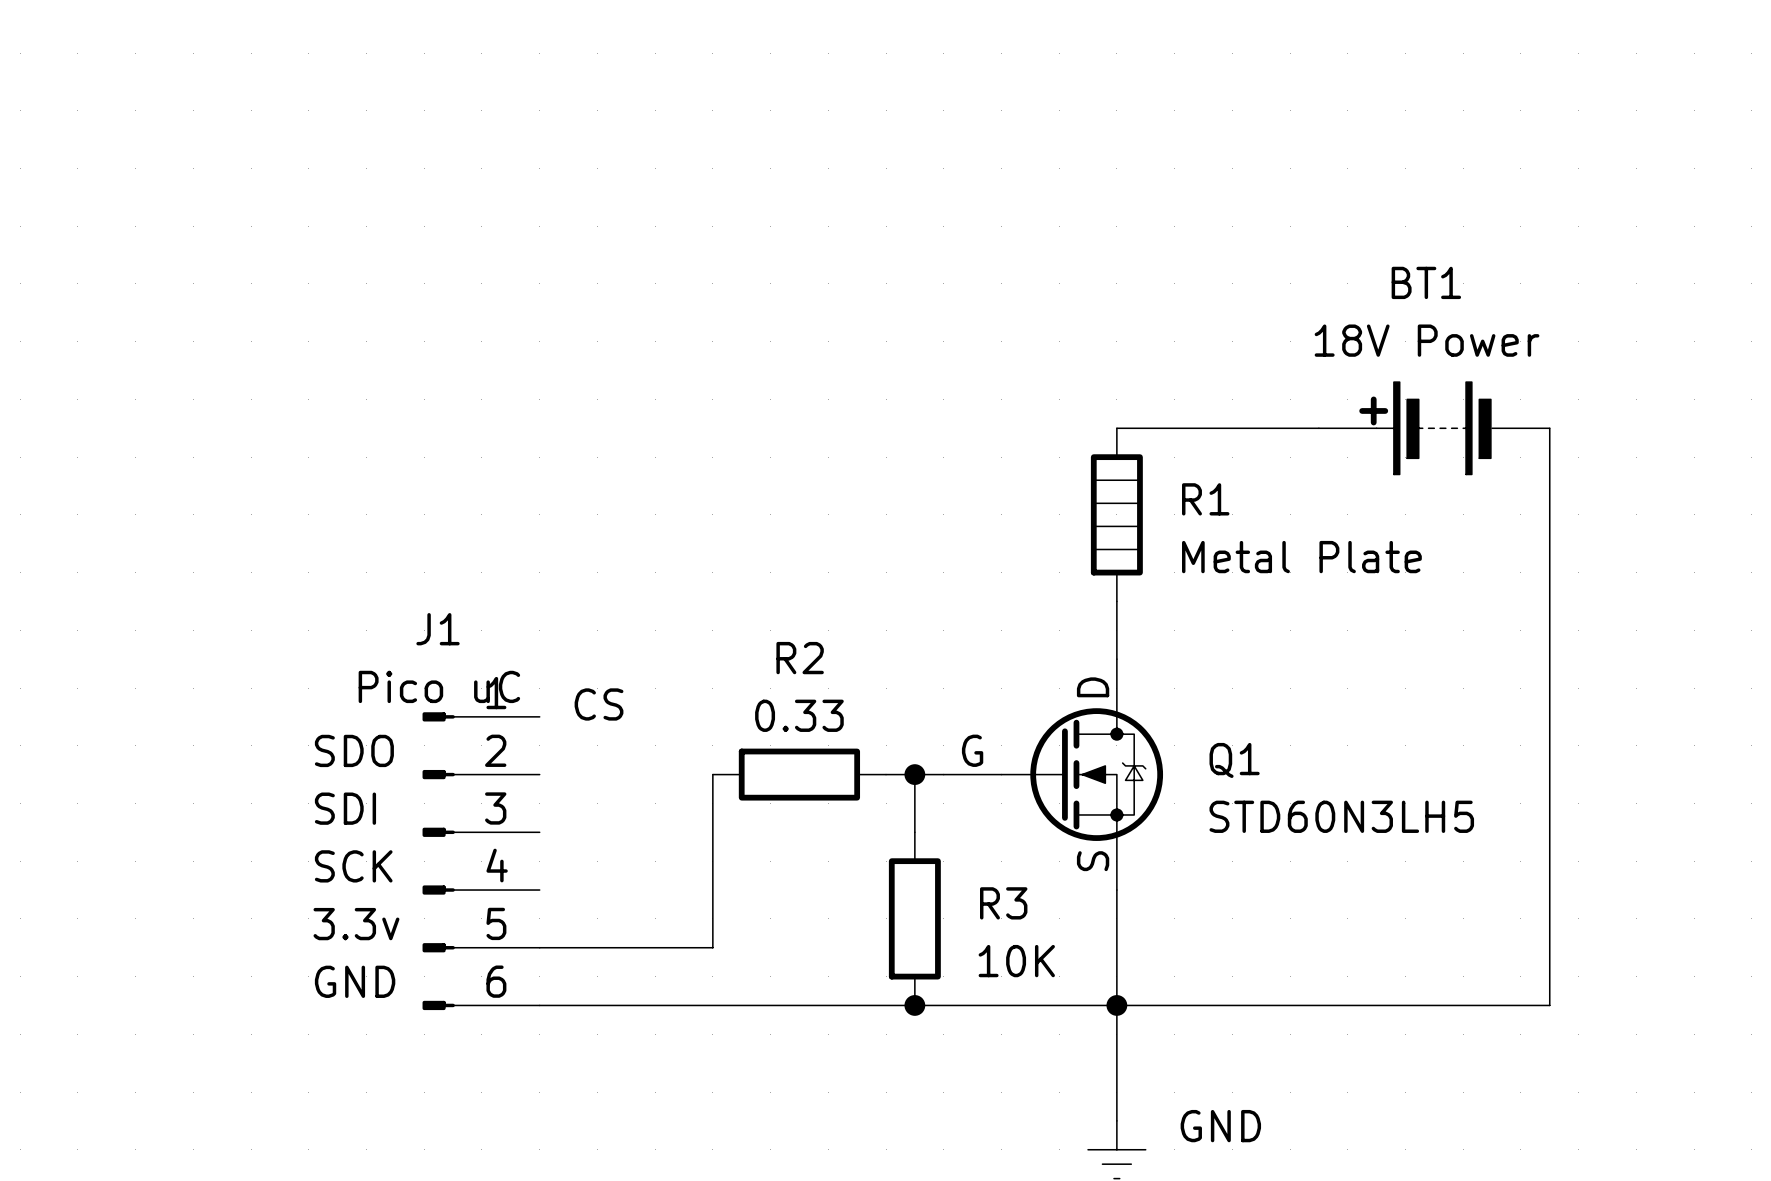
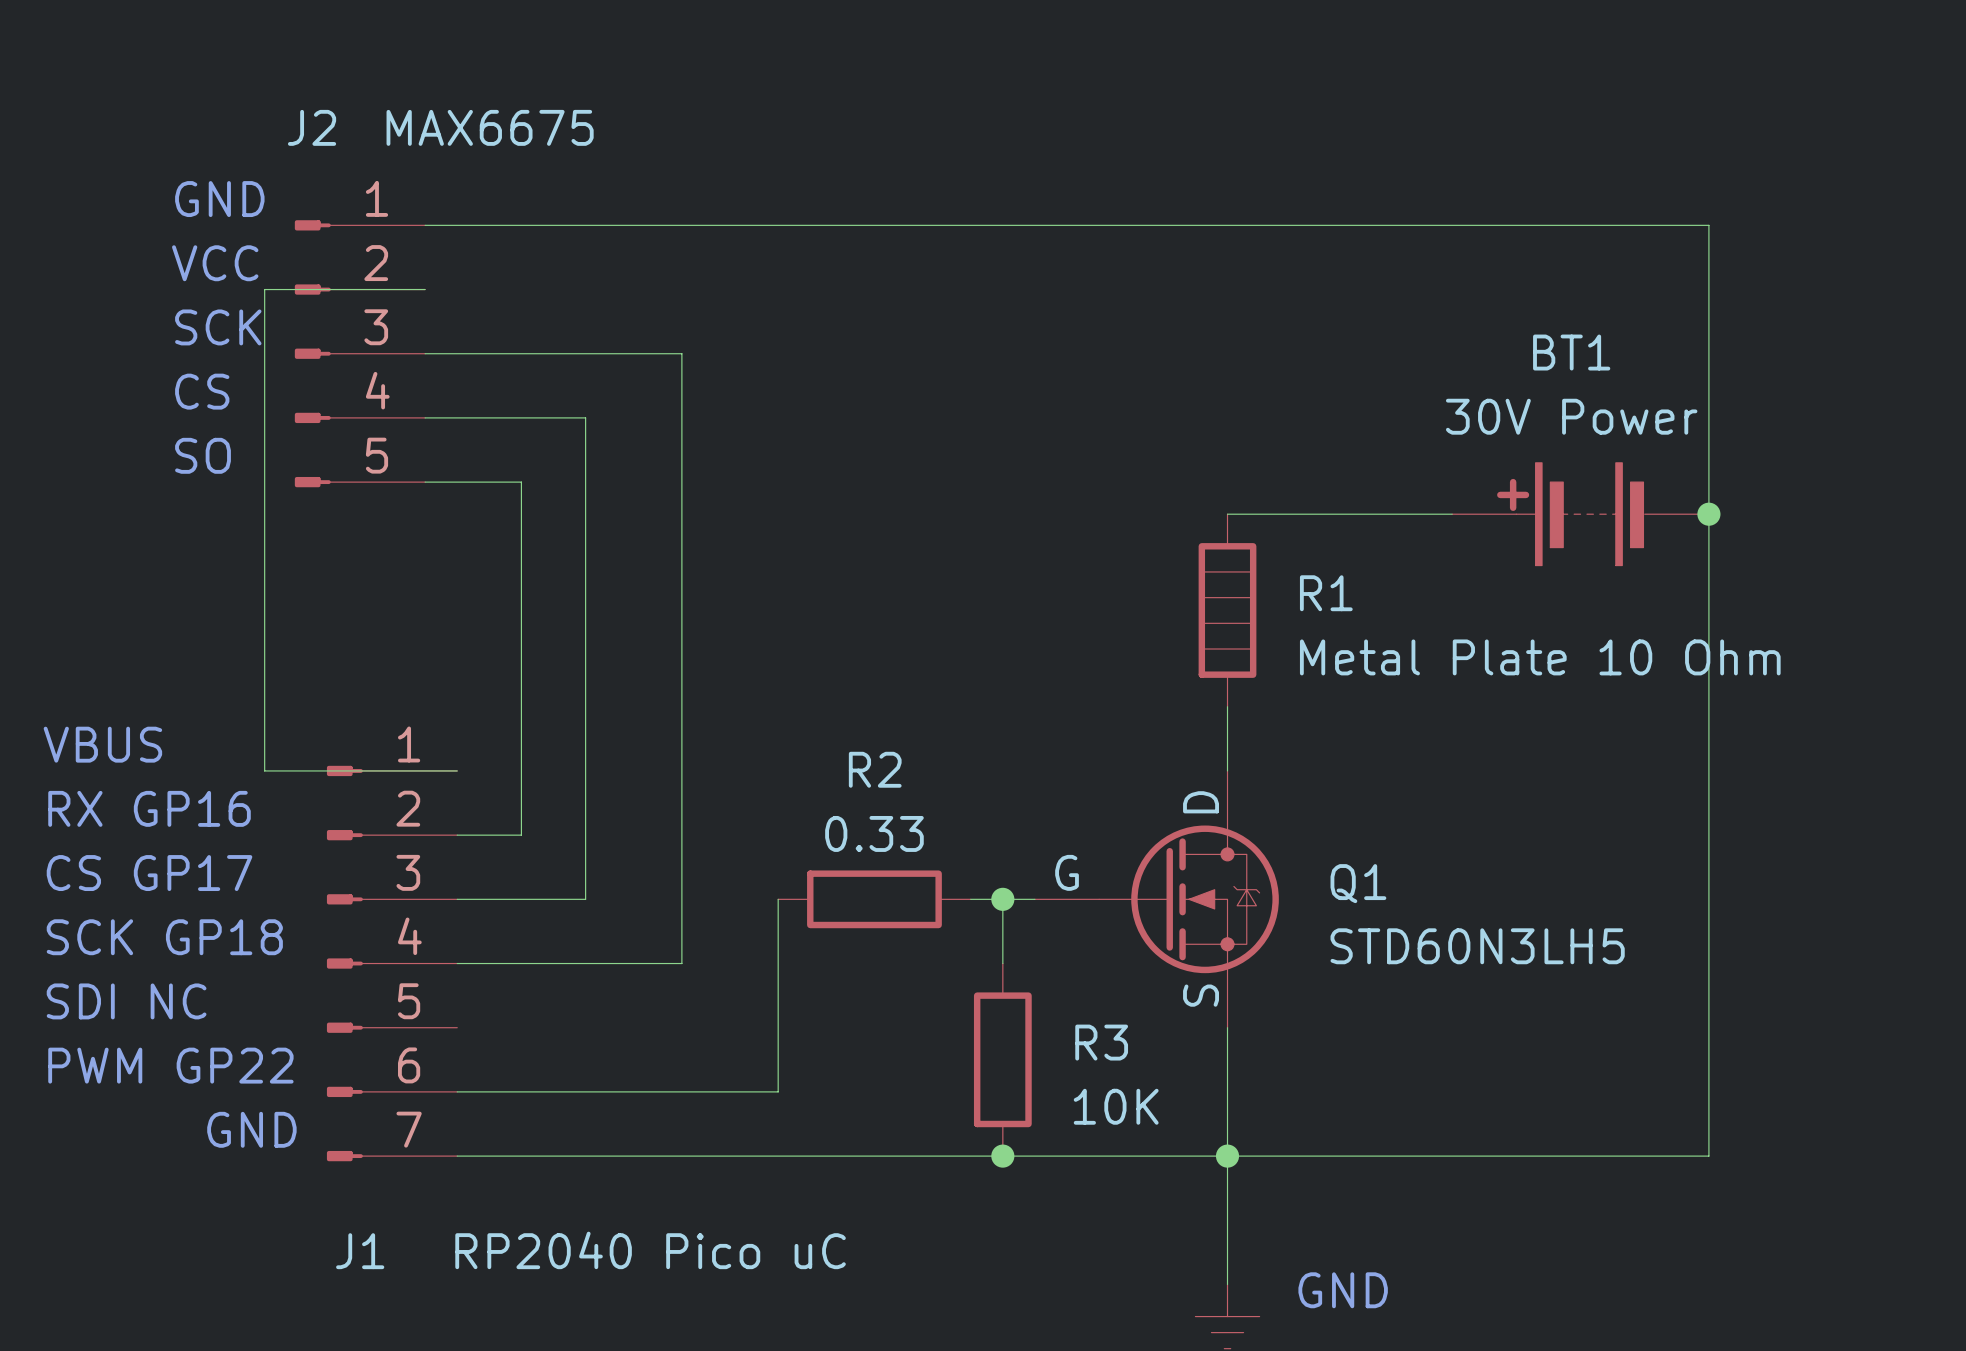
text: none -> GND (219, 199)
wire: none -> (425, 225) (1708, 225) (1708, 514)
text: none -> VCC (215, 263)
wire: none -> (425, 289) (264, 289) (264, 770) (457, 770)
text: none -> SCK (218, 327)
J2: none -> MAX6675 (359, 353)
wire: none -> (425, 353) (681, 353) (681, 963) (457, 963)
BT1 value: 18V Power (1427, 340) -> 30V Power (1571, 416)
wire: none -> (425, 417) (585, 417) (585, 899) (457, 899)
text: none -> SO (203, 455)
wire: none -> (425, 482) (521, 482) (521, 835) (457, 835)
junction: none -> (1708, 514)
R1 value: Metal Plate (1301, 557) -> Metal Plate 10 Ohm (1540, 657)
J1 name position: J1 (438, 629) -> J1 (360, 1251)
text: none -> VBUS (102, 744)
J1 value: Pico uC (439, 686) -> RP2040 Pico uC (650, 1250)
text: none -> RX GP16 (149, 808)
text position: CS (599, 704) -> CS (202, 391)
J1 symbol: [422, 712, 540, 1011] -> [326, 765, 458, 1162]
text: none -> CS GP17 (149, 873)
text: SDO (354, 750) -> none
text: none -> SCK GP18 (164, 937)
text: SDI (345, 808) -> none
text: none -> SDI NC (126, 1001)
text: SCK (353, 866) -> none
text: none -> PWM GP22 (170, 1065)
text: 3.3v (356, 924) -> none
text position: GND (355, 981) -> GND (251, 1129)

